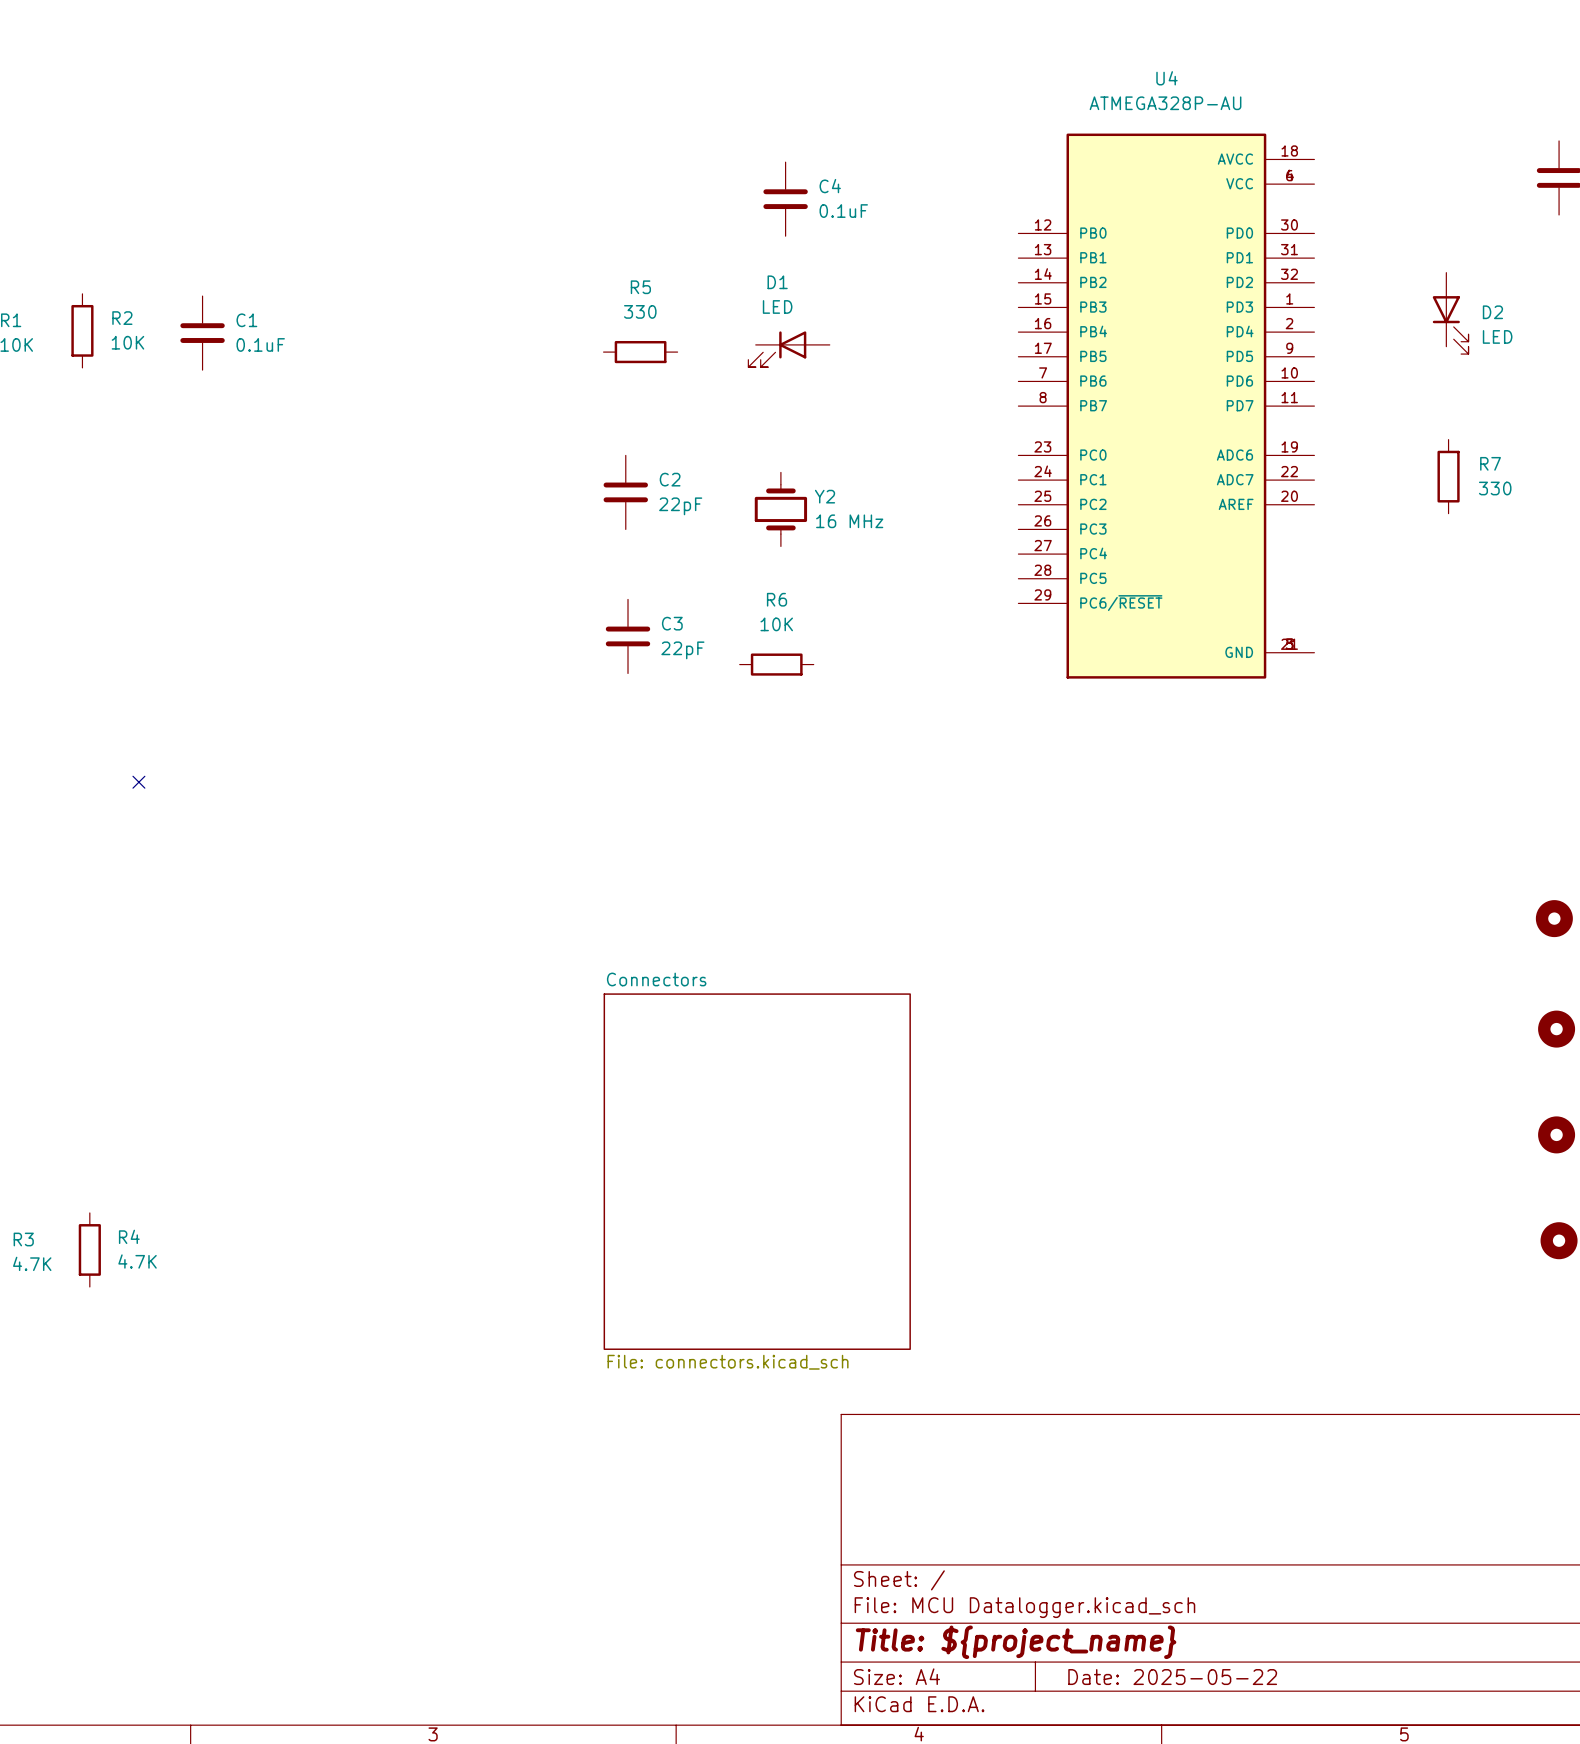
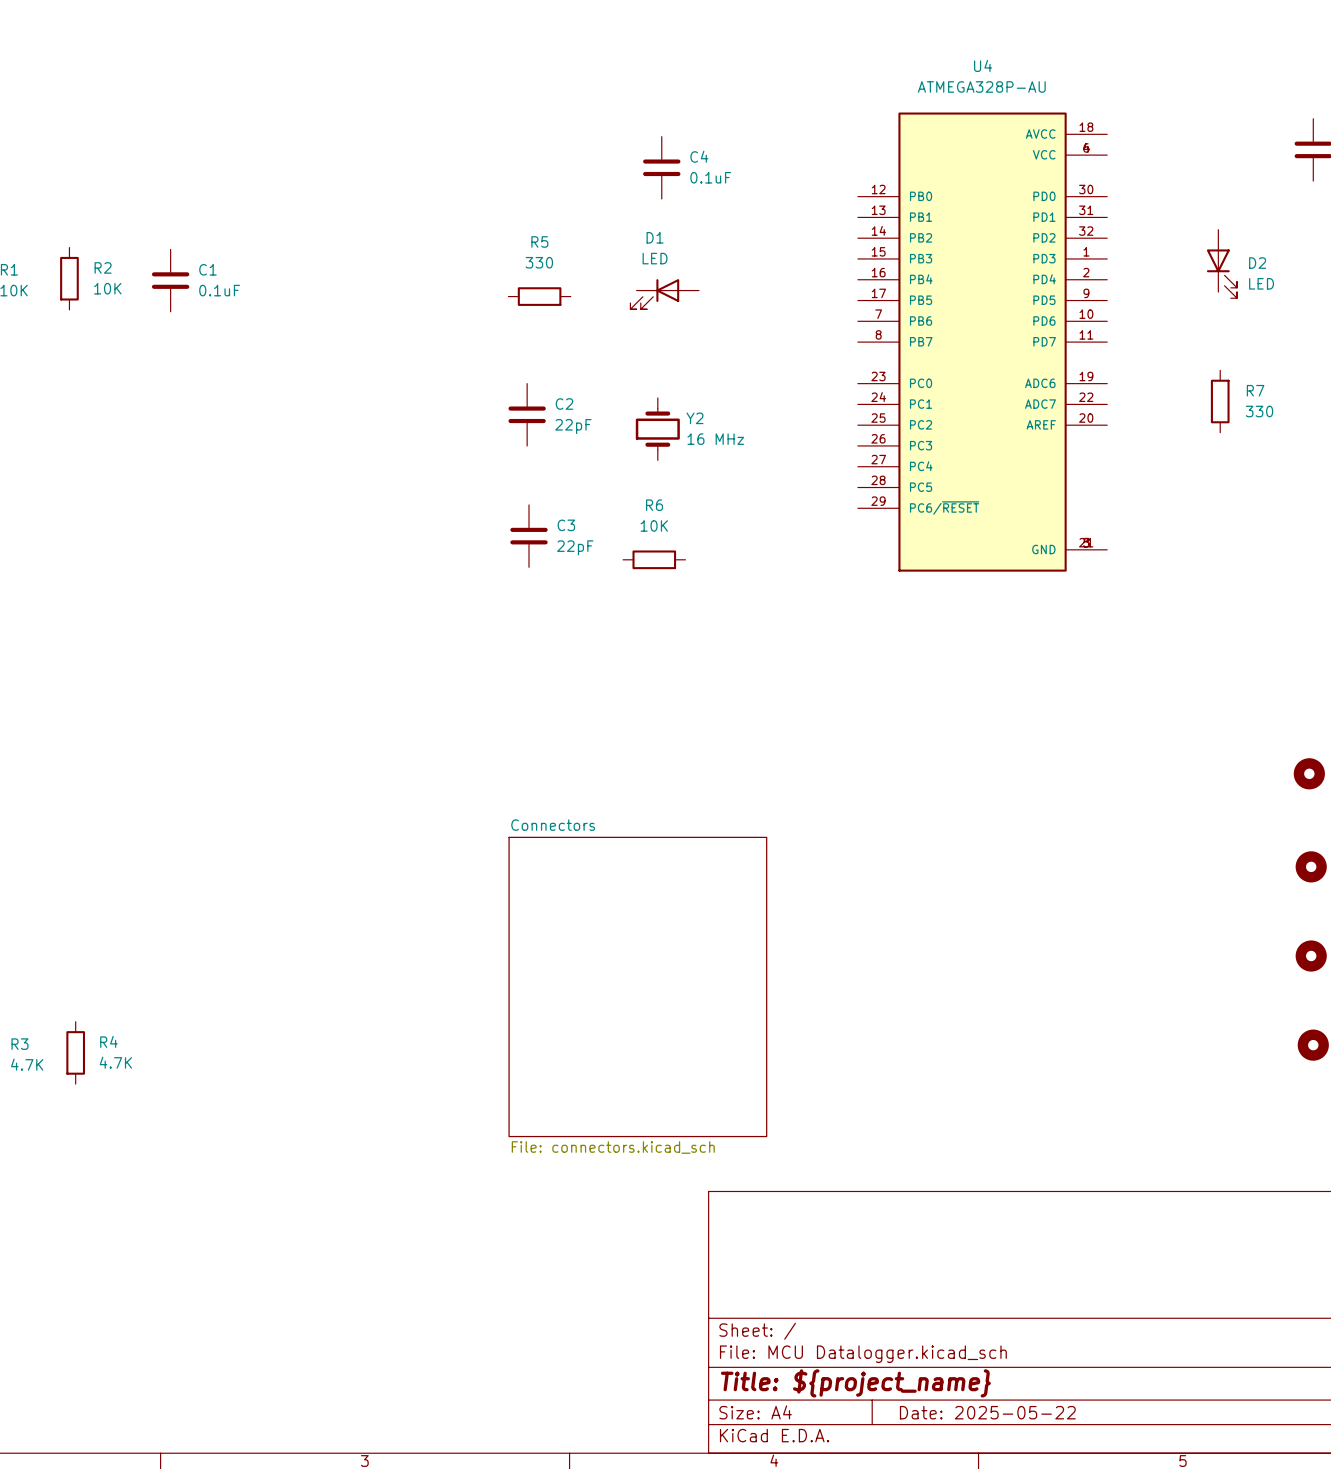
no-connect mark: (138, 782) -> none

